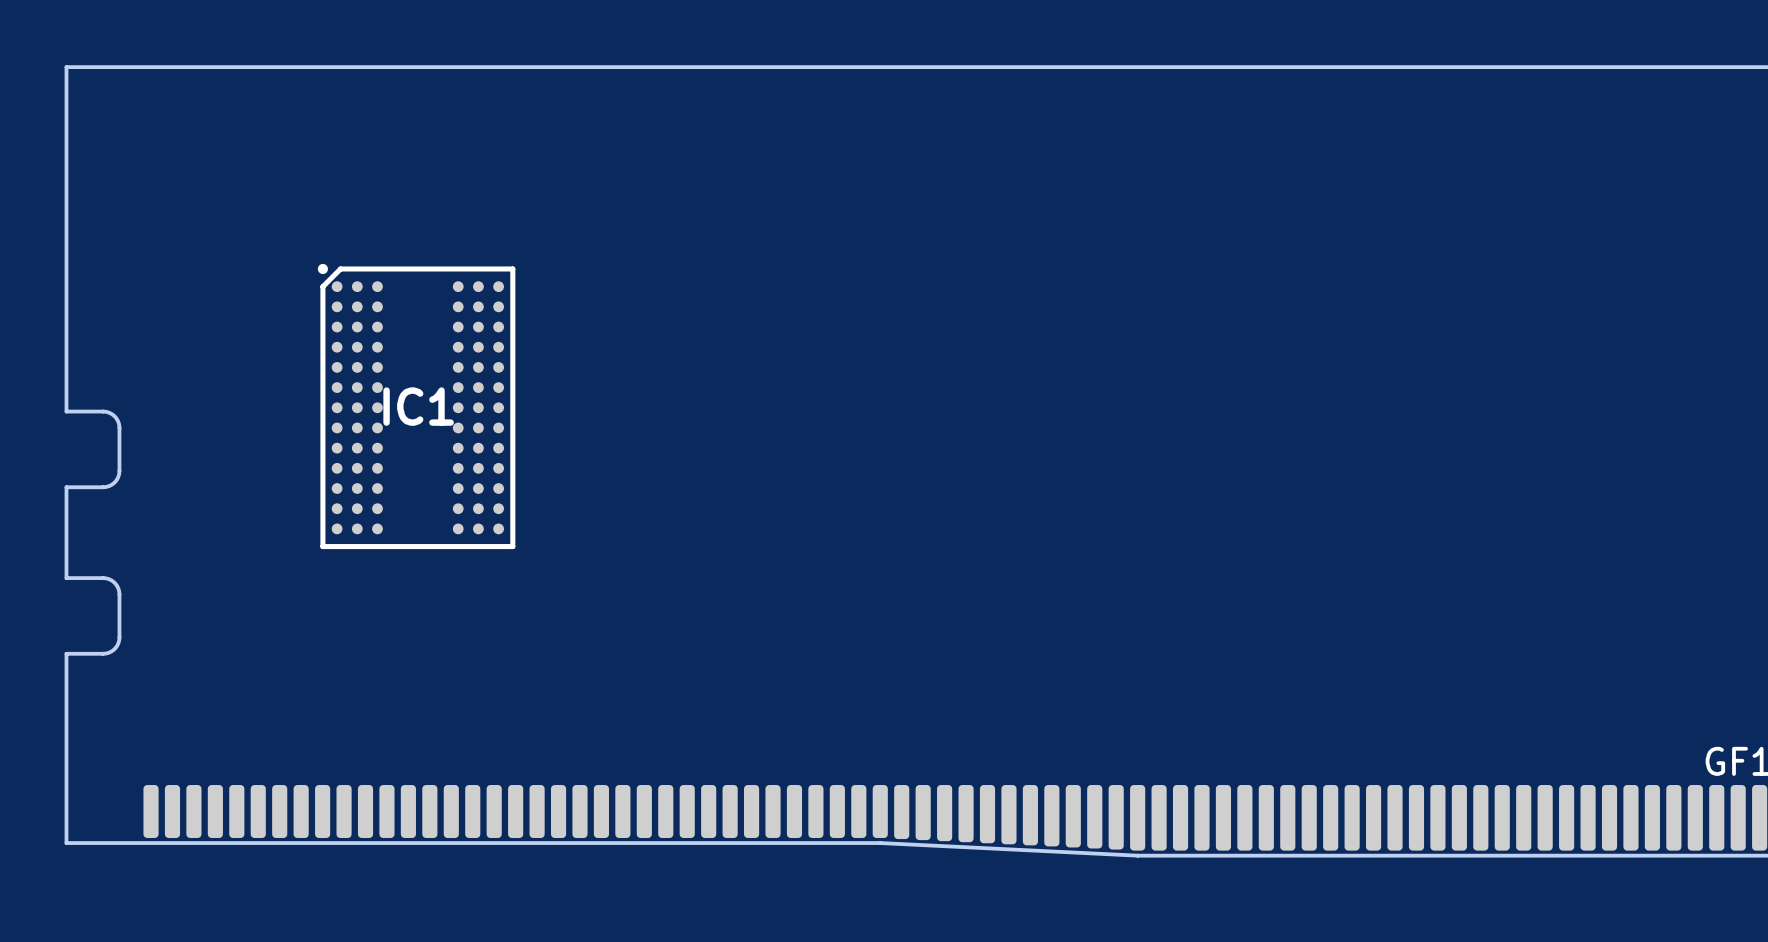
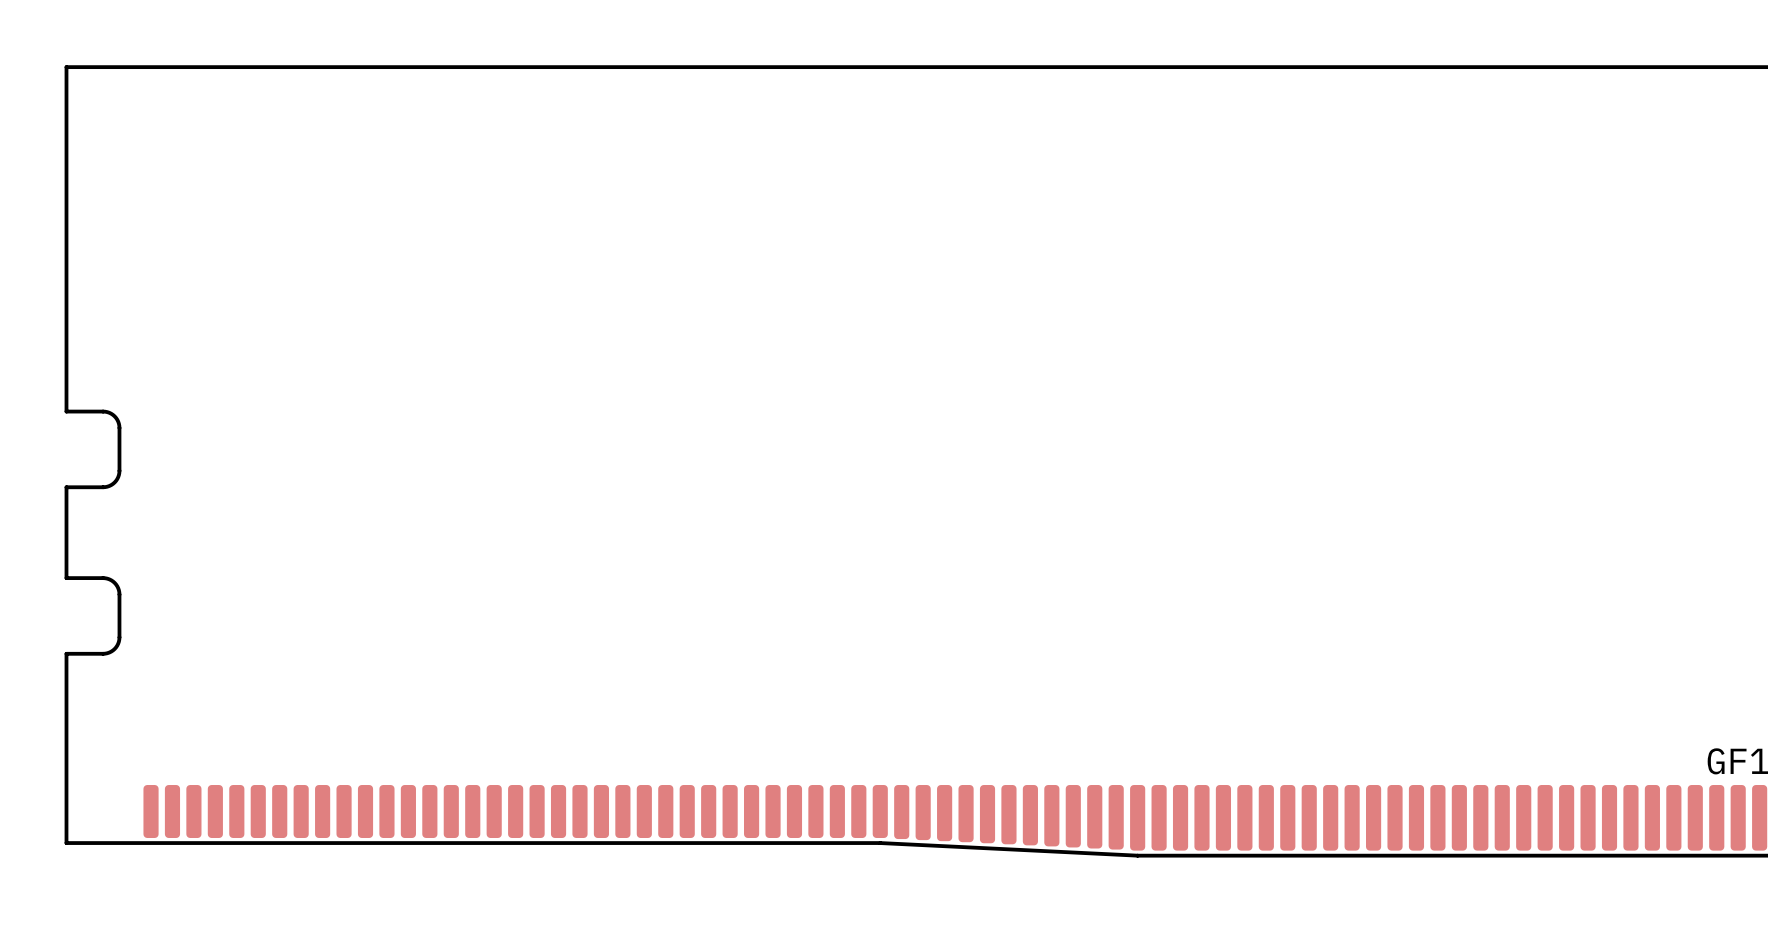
IC1: (416, 406) -> none

